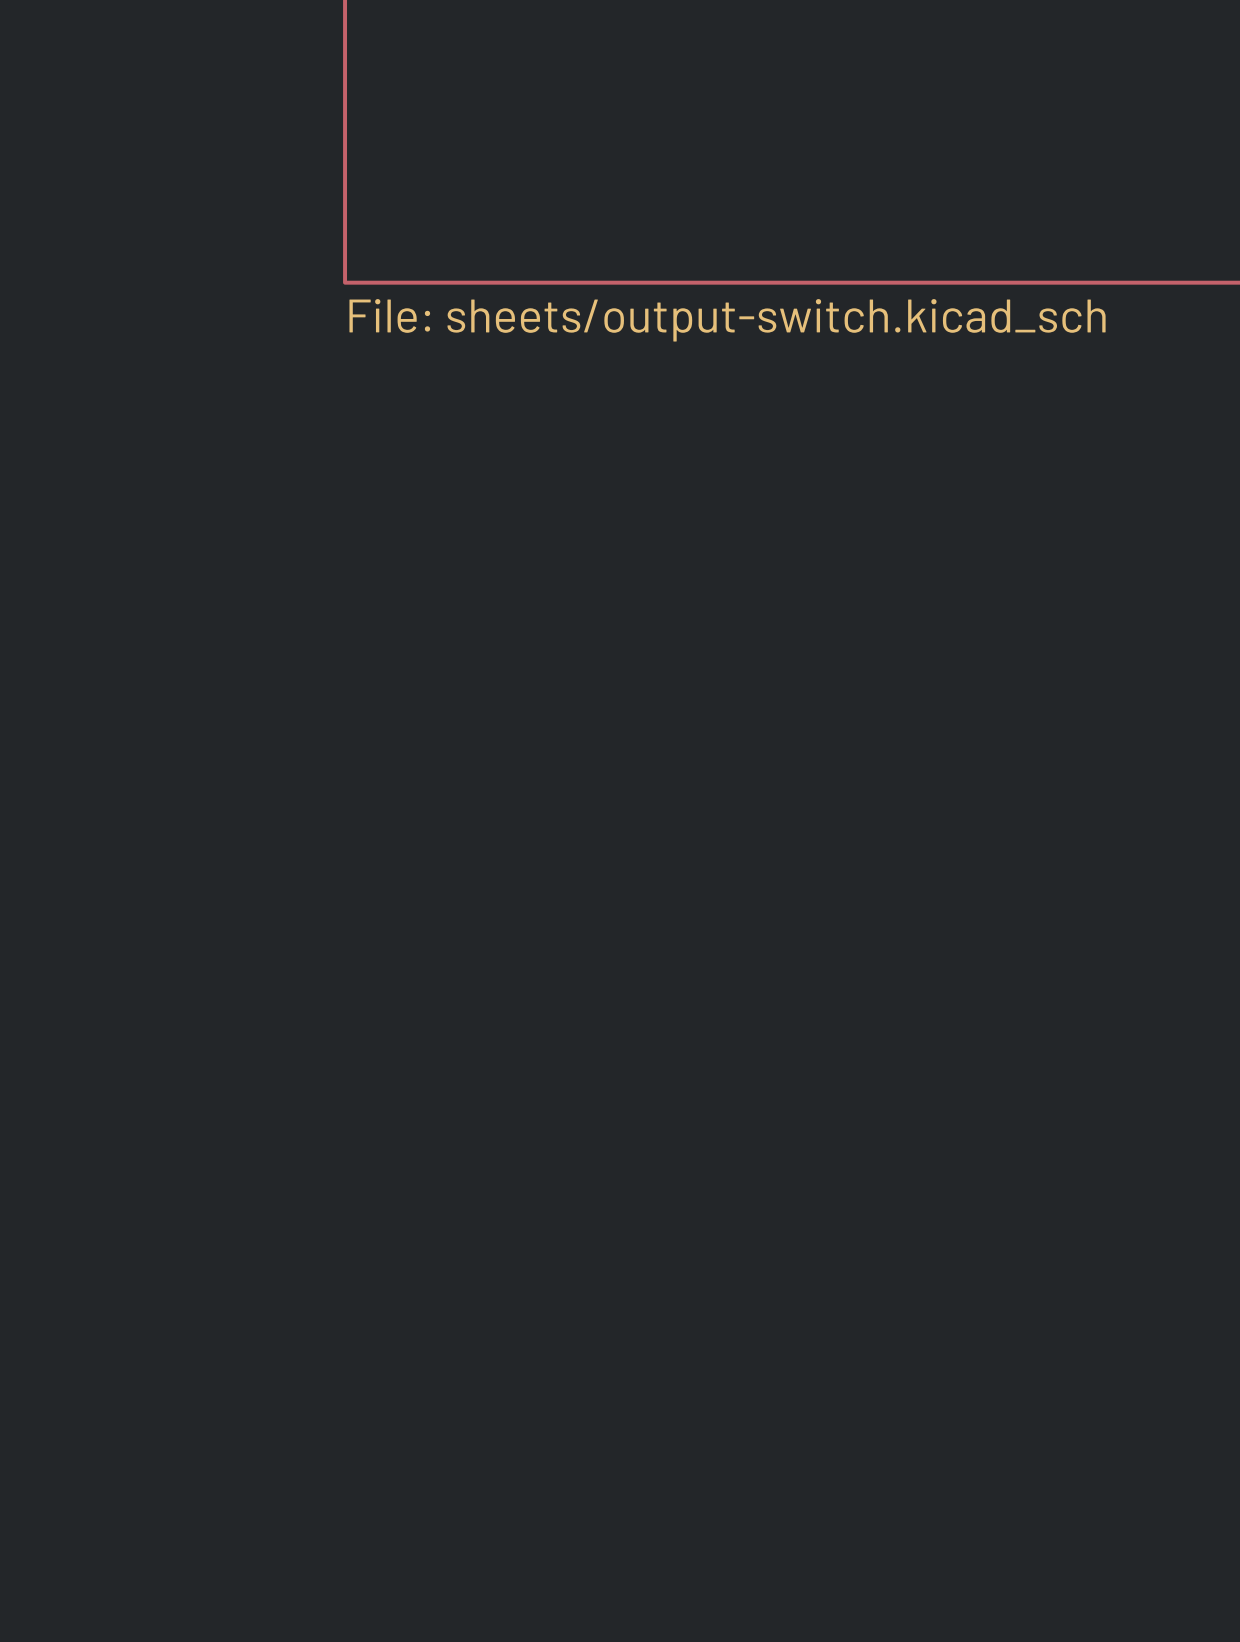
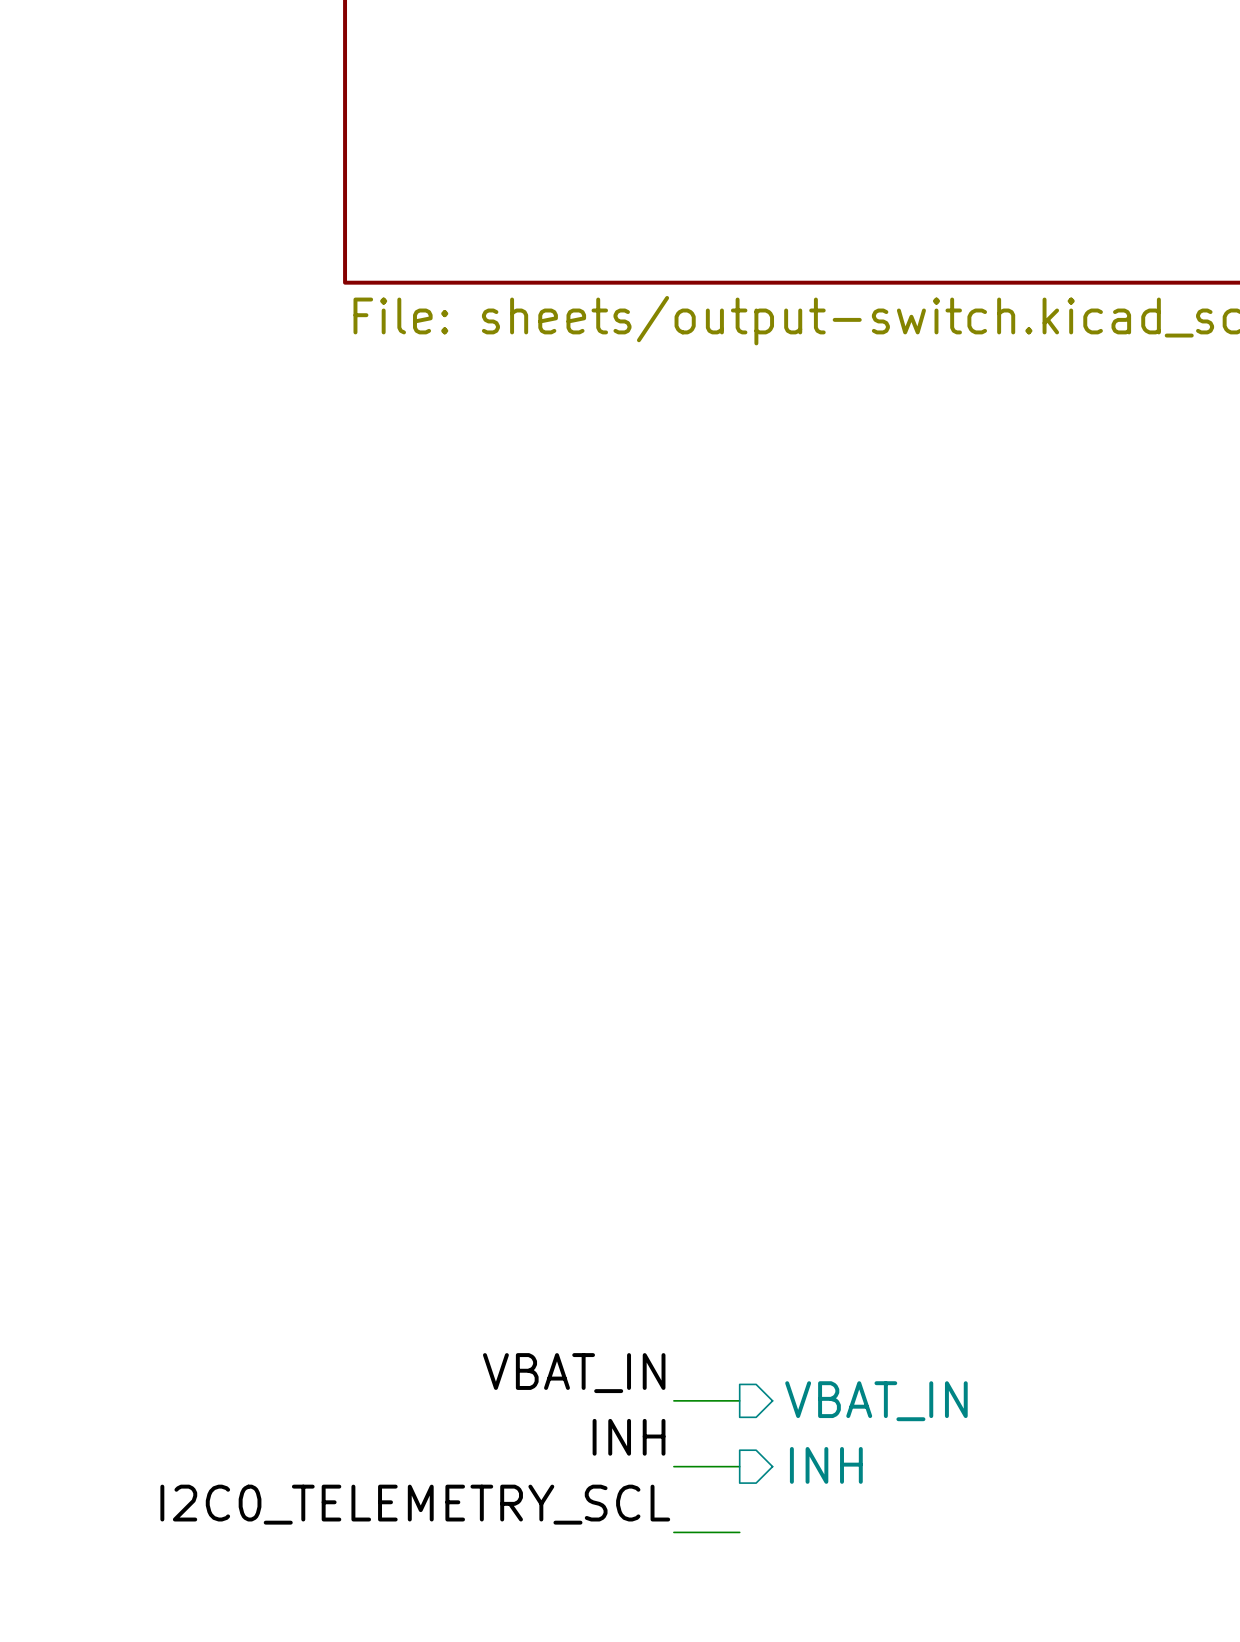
label: none -> VBAT_IN (574, 1373)
sheet pin: none -> VBAT_IN (876, 1401)
wire: none -> (673, 1400) (739, 1400)
label: none -> INH (629, 1437)
sheet pin: none -> INH (826, 1465)
wire: none -> (673, 1466) (739, 1466)
label: none -> I2C0_TELEMETRY_SCL (415, 1504)
wire: none -> (673, 1532) (739, 1532)

